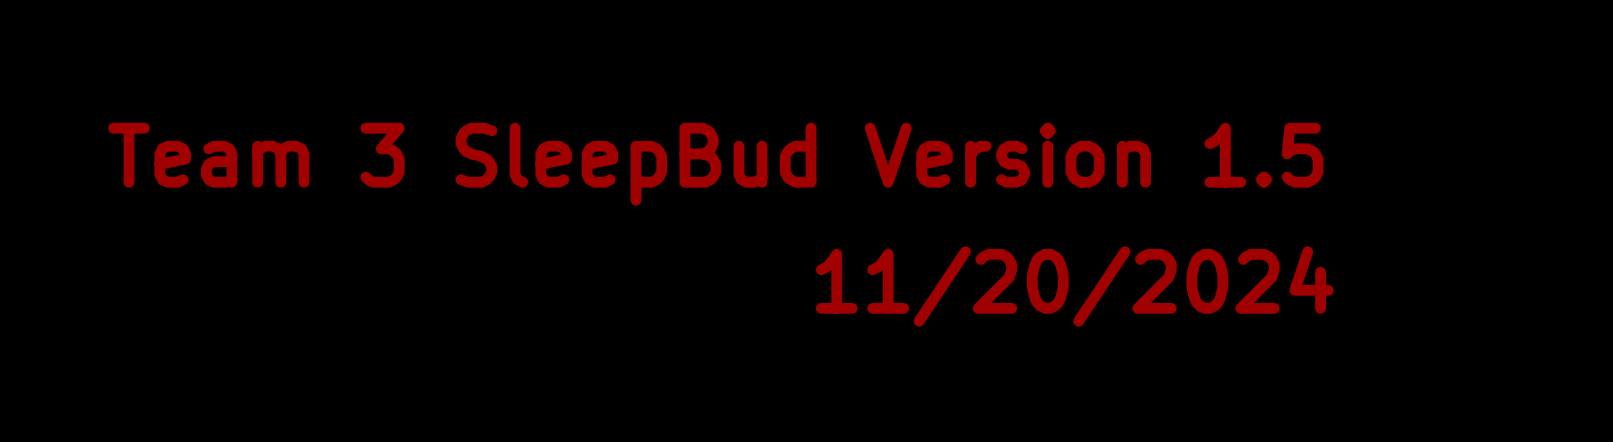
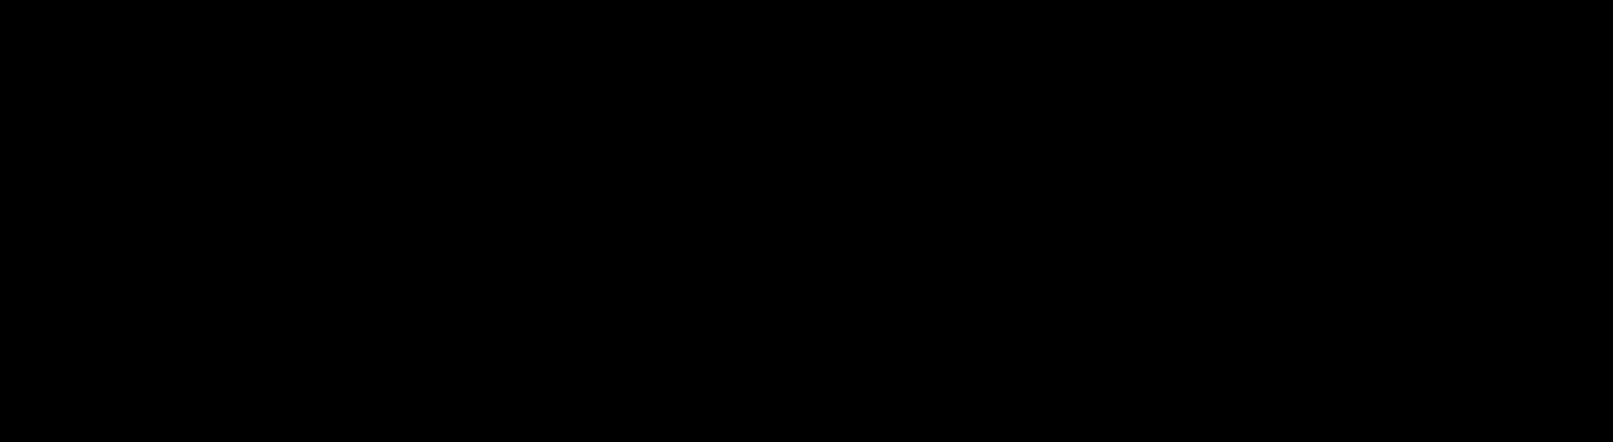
text: Team 3 SleepBud Version 1.5 (715, 164) -> none
text: 11/20/2024 (1074, 286) -> none

